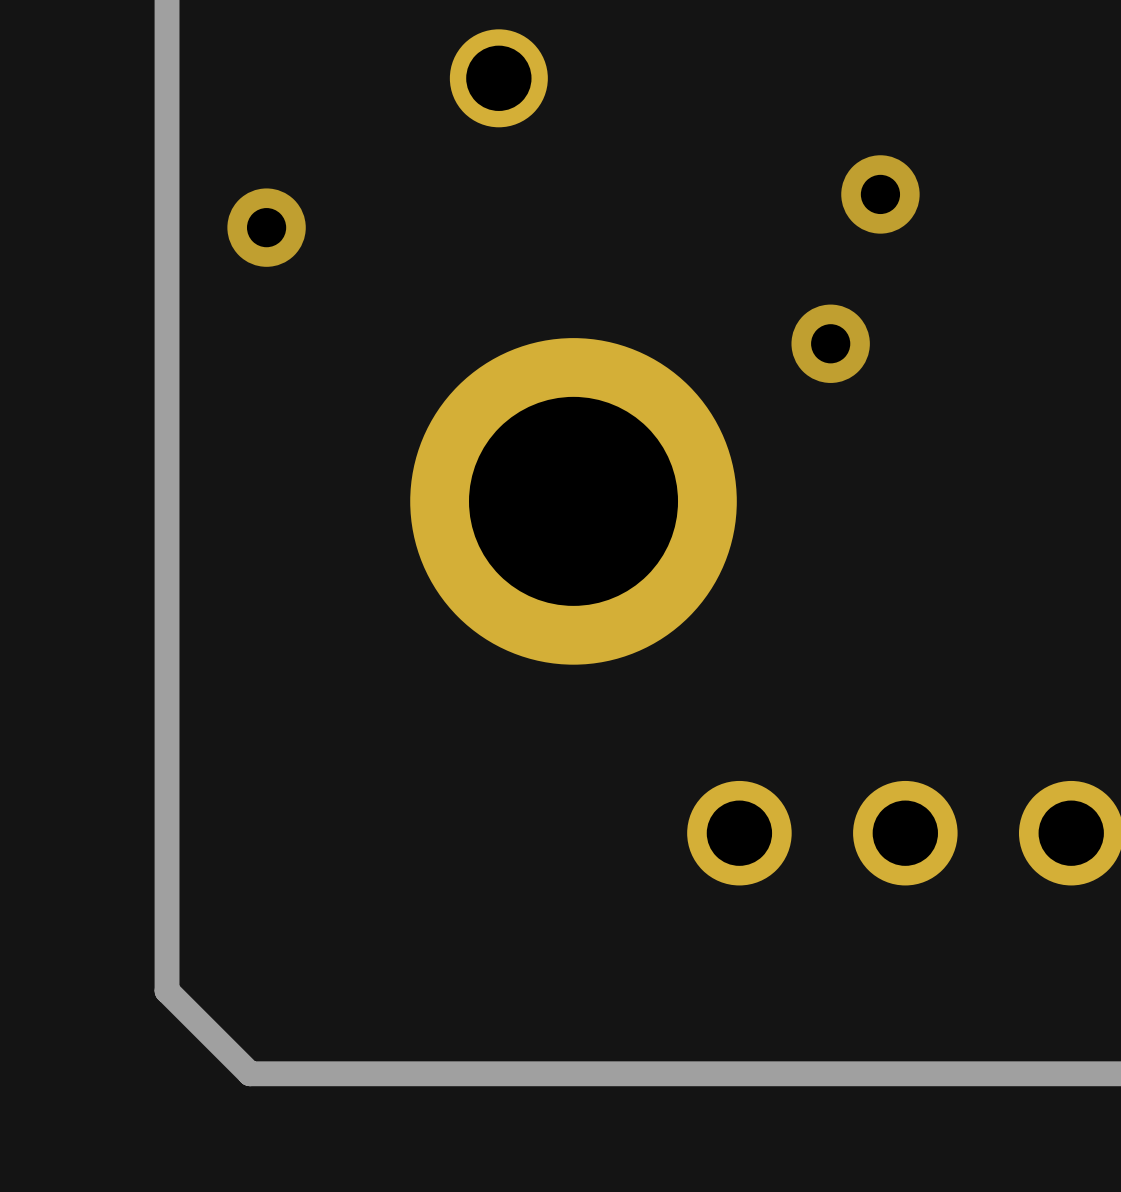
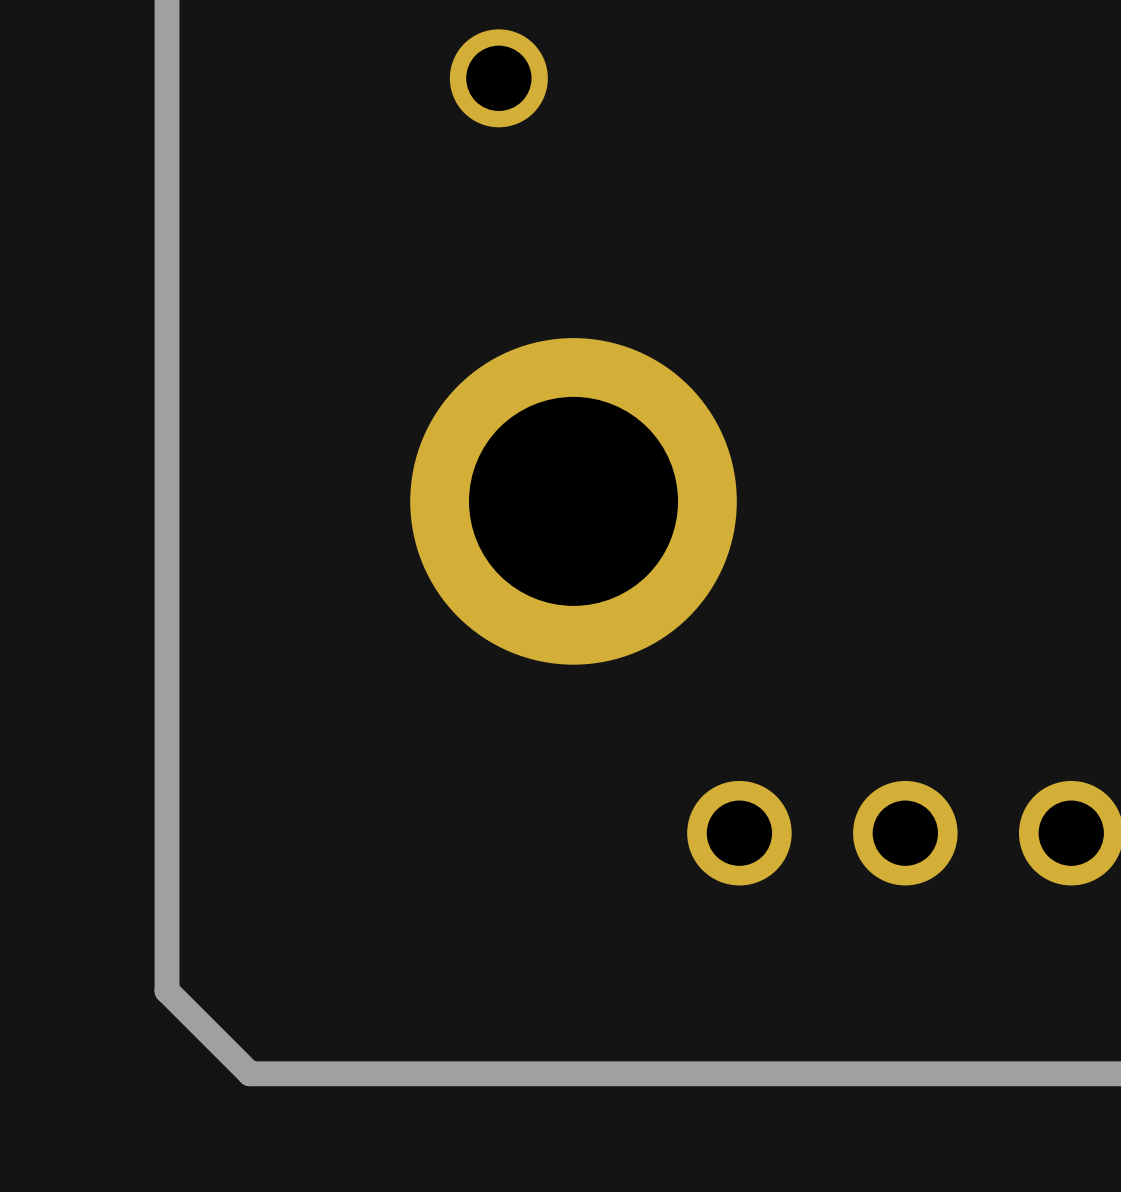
via: (880, 194) -> none
via: (266, 227) -> none
via: (830, 343) -> none

